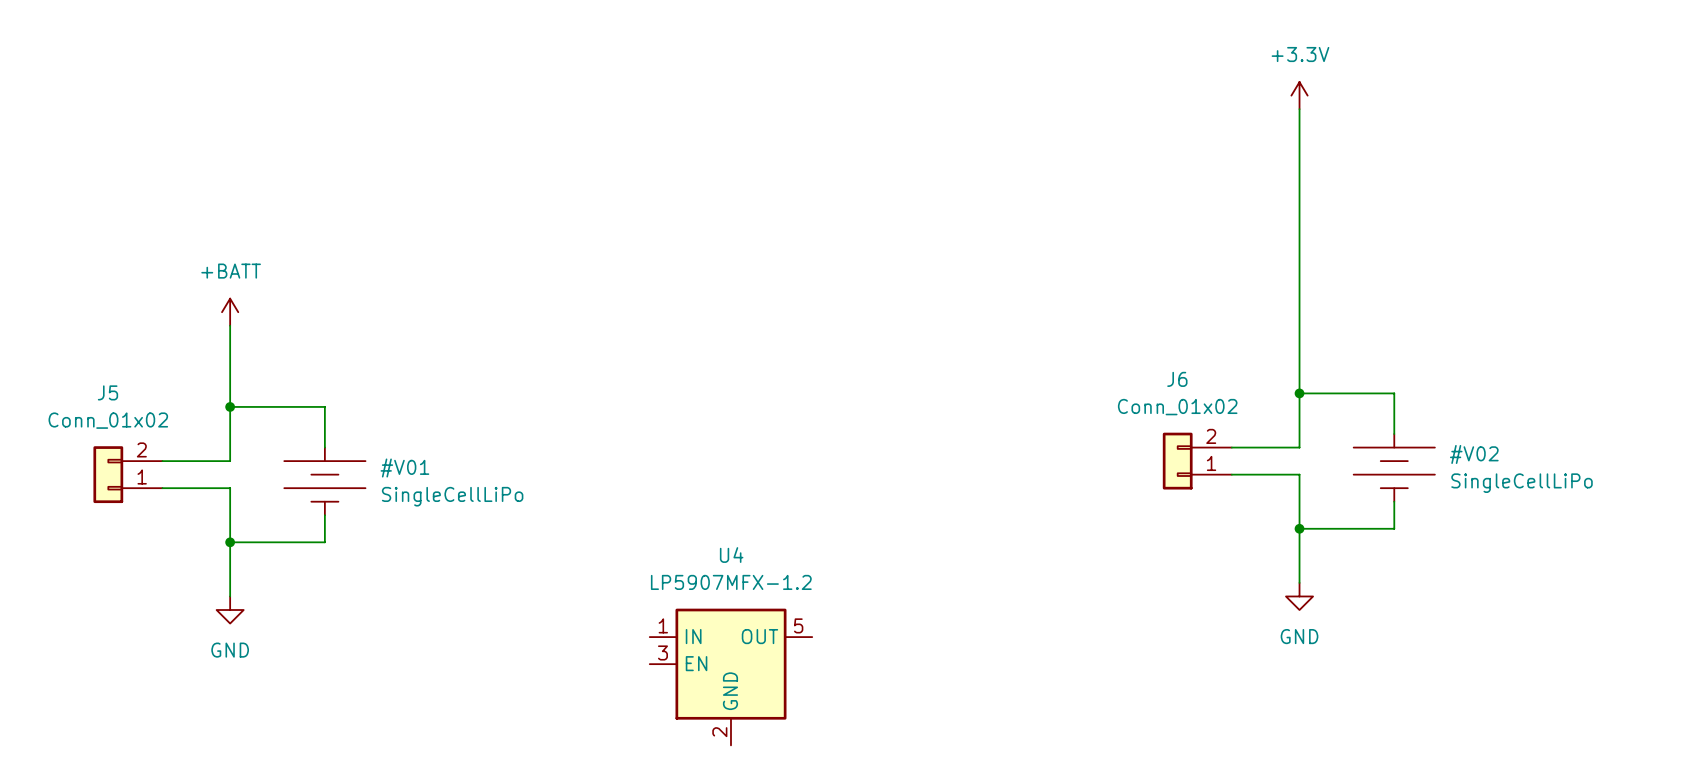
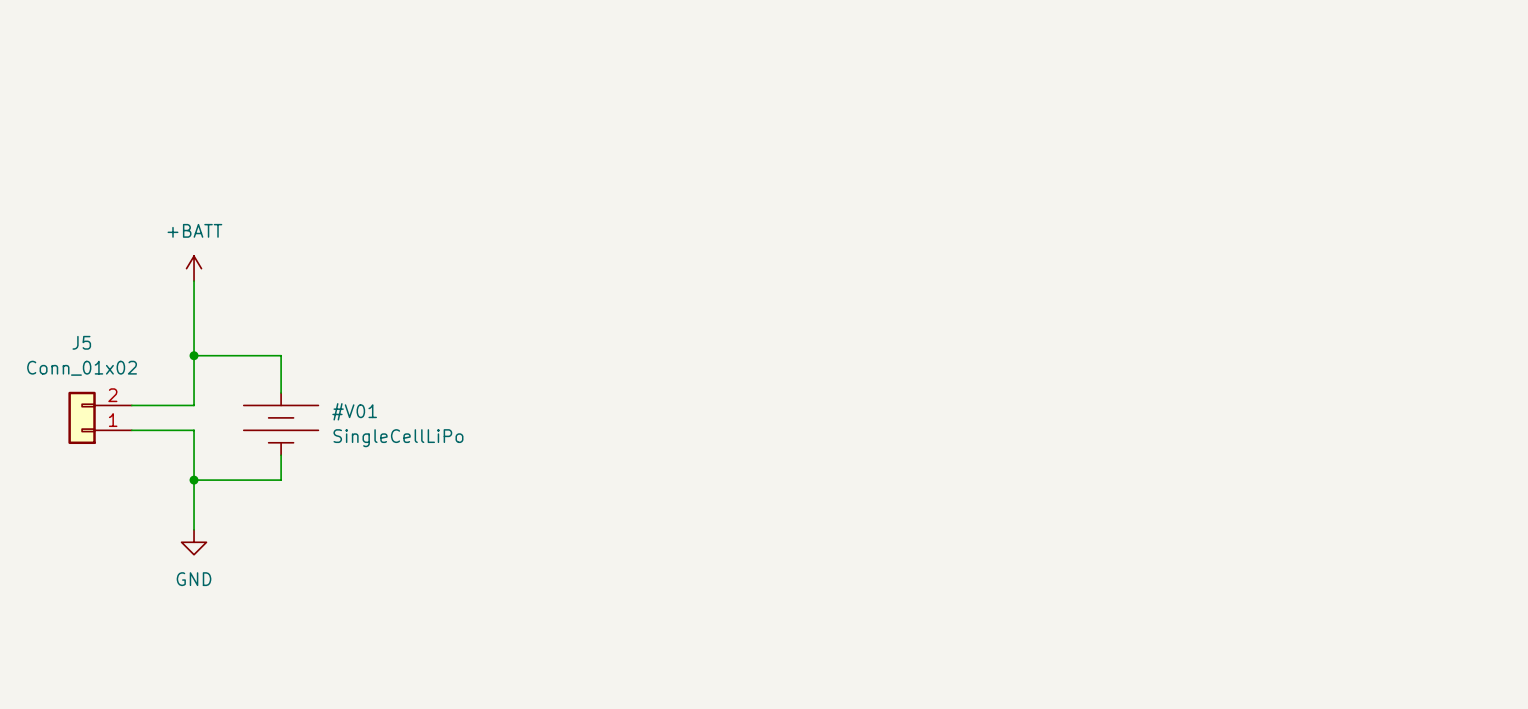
power symbol: +3.3V (1299, 95) -> none
wire: (1299, 109) (1299, 447) (1231, 447) -> none
wire: (1299, 393) (1394, 393) (1394, 434) -> none
junction: (1299, 393) -> none
J6: Conn_01x02 (1197, 461) -> none
#V02: SingleCellLiPo (1394, 467) -> none
wire: (1231, 474) (1299, 474) (1299, 582) -> none
wire: (1394, 501) (1394, 528) (1299, 528) -> none
junction: (1299, 528) -> none
power symbol: GND (1299, 596) -> none
U4: LP5907MFX-1.2 (730, 677) -> none

